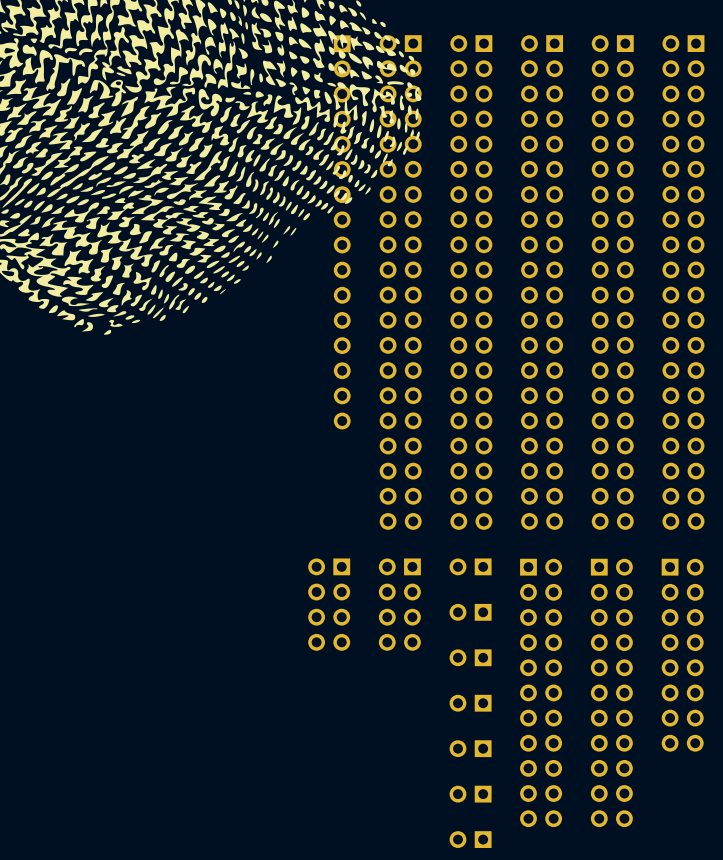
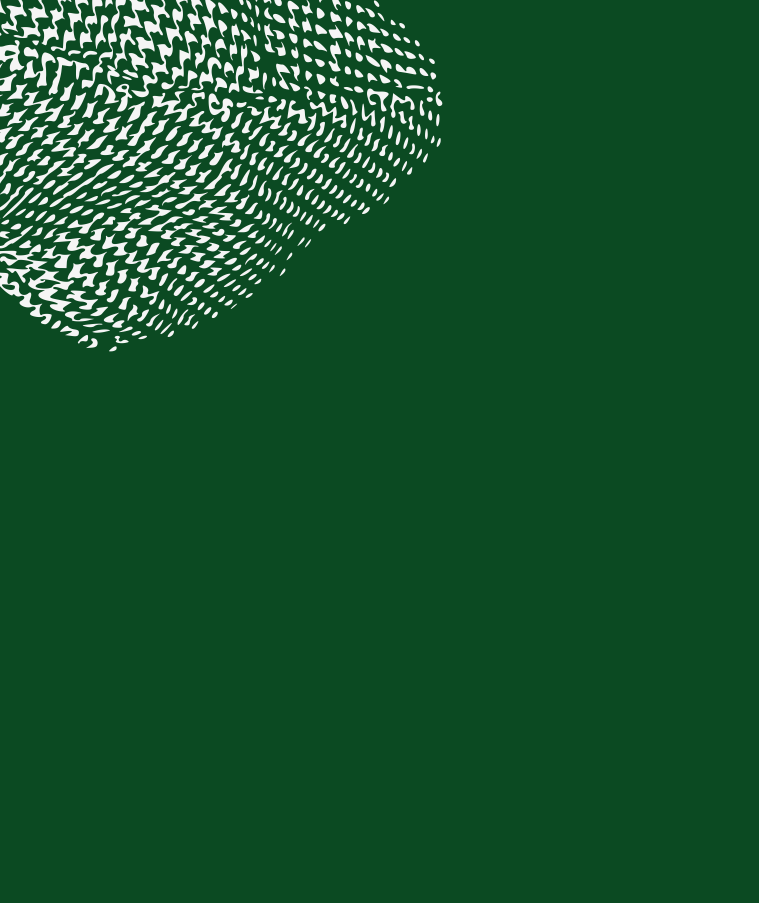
part: (342, 232) -> none
part: (400, 282) -> none
part: (471, 282) -> none
part: (542, 282) -> none
part: (612, 282) -> none
part: (683, 282) -> none
part: (470, 566) -> none
part: (329, 604) -> none
part: (399, 604) -> none
part: (470, 612) -> none
part: (682, 655) -> none
part: (470, 657) -> none
part: (541, 692) -> none
part: (611, 692) -> none
part: (470, 703) -> none
part: (470, 748) -> none
part: (470, 794) -> none
part: (470, 839) -> none

